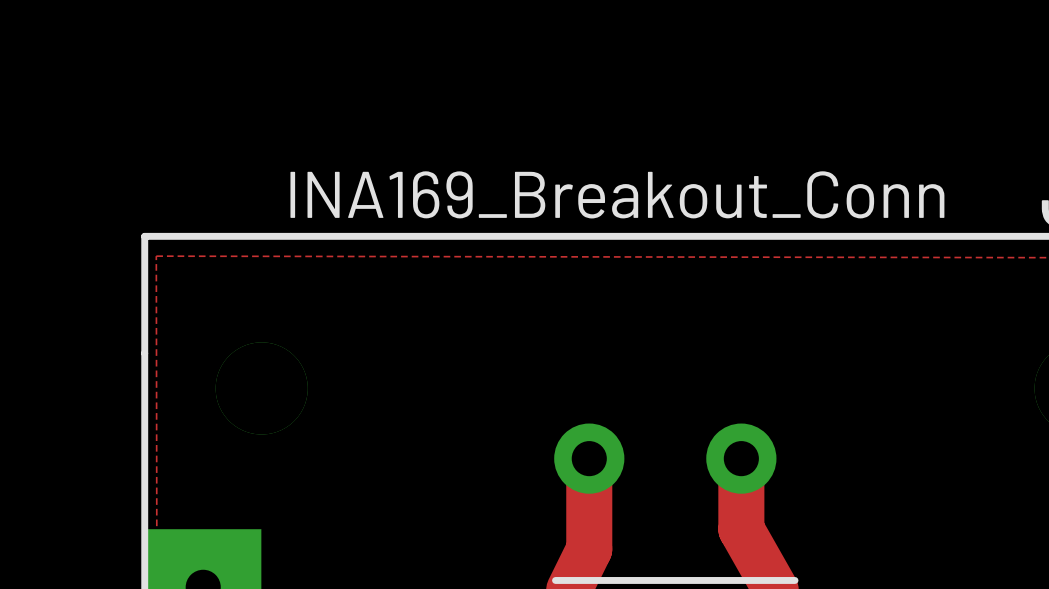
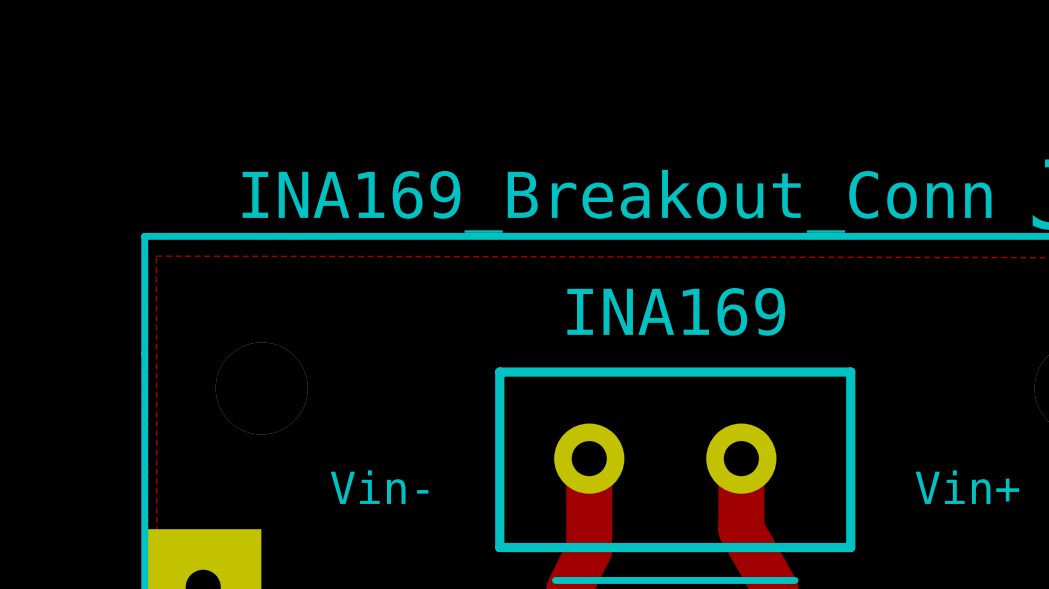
text: none -> INA169 (676, 311)
line: none -> (499, 372) (499, 547) (850, 547) (850, 372) (499, 372)
text: none -> Vin- (379, 487)
text: none -> Vin+ (967, 487)

